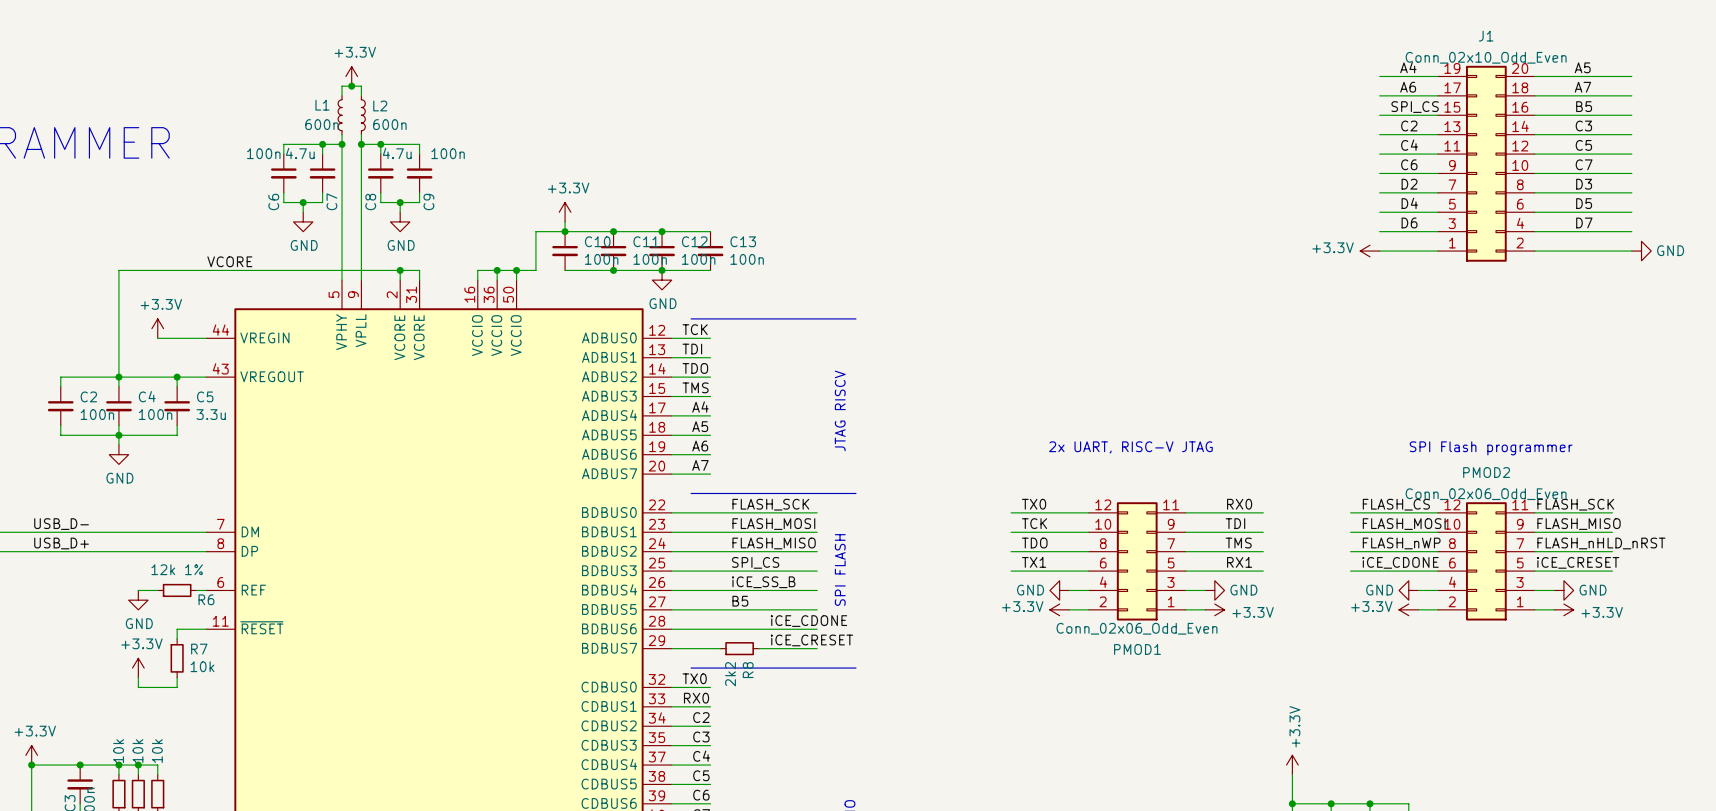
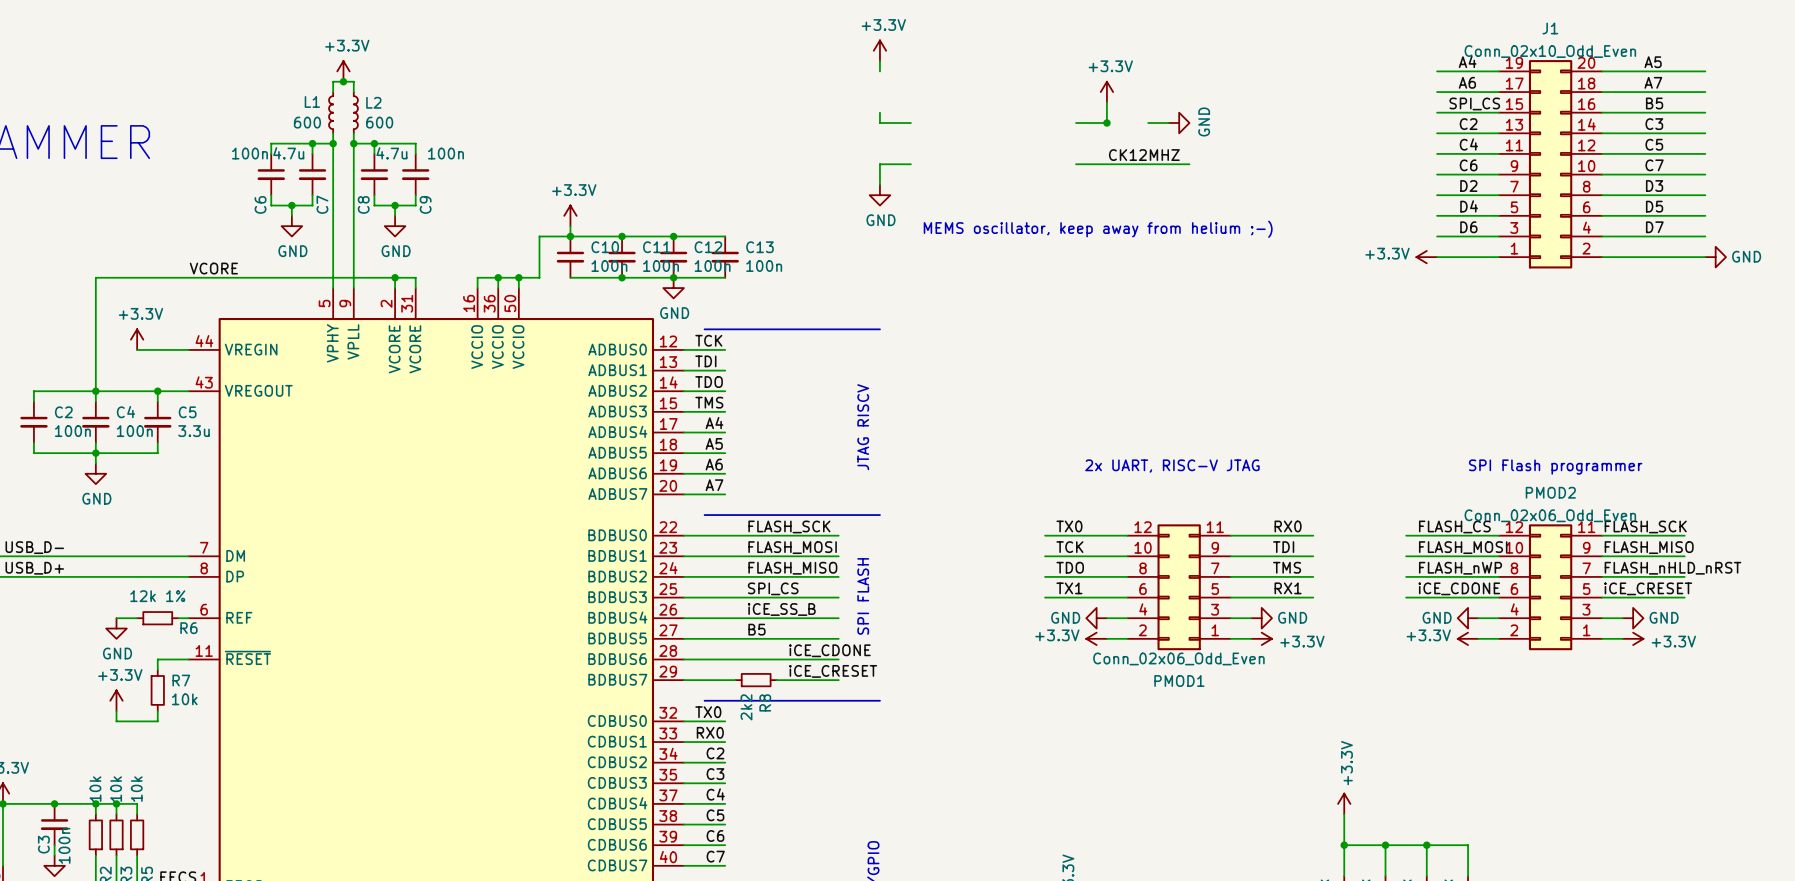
power symbol: none -> +3.3V (879, 50)
wire: none -> (879, 61) (879, 71)
power symbol: none -> +3.3V (1106, 92)
wire: none -> (1106, 102) (1106, 122) (1075, 122)
wire: none -> (879, 112) (879, 122) (910, 122)
L1 value: 600n (321, 124) -> 600 (307, 122)
L2 value: 600n (389, 124) -> 600 (379, 122)
junction: none -> (1106, 122)
wire: none -> (1148, 122) (1168, 122)
power symbol: none -> GND (1179, 122)
label: none -> CK12MHZ (1144, 155)
wire: none -> (910, 164) (879, 164) (879, 184)
wire: none -> (1075, 164) (1189, 164)
power symbol: none -> GND (879, 195)
text: none -> MEMS oscillator, keep away from helium ;-) (1098, 229)

